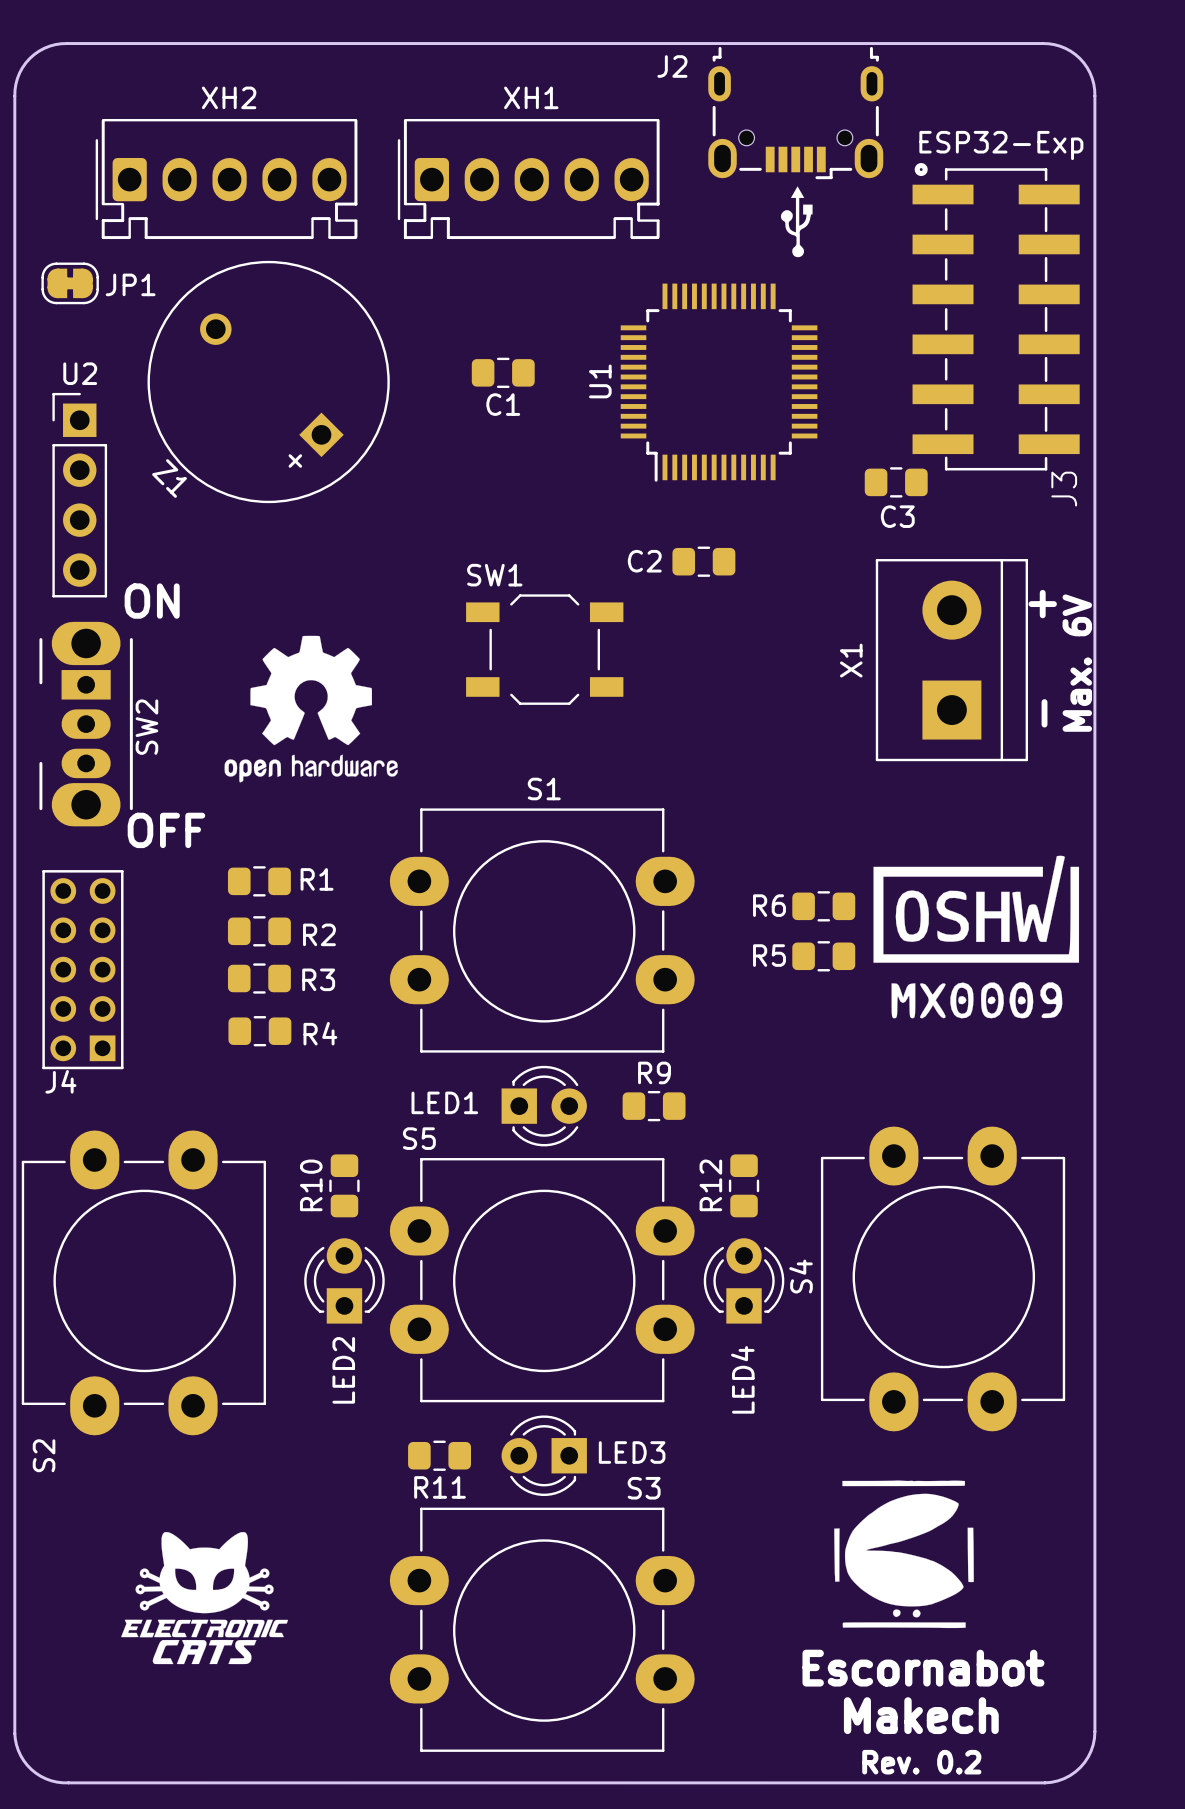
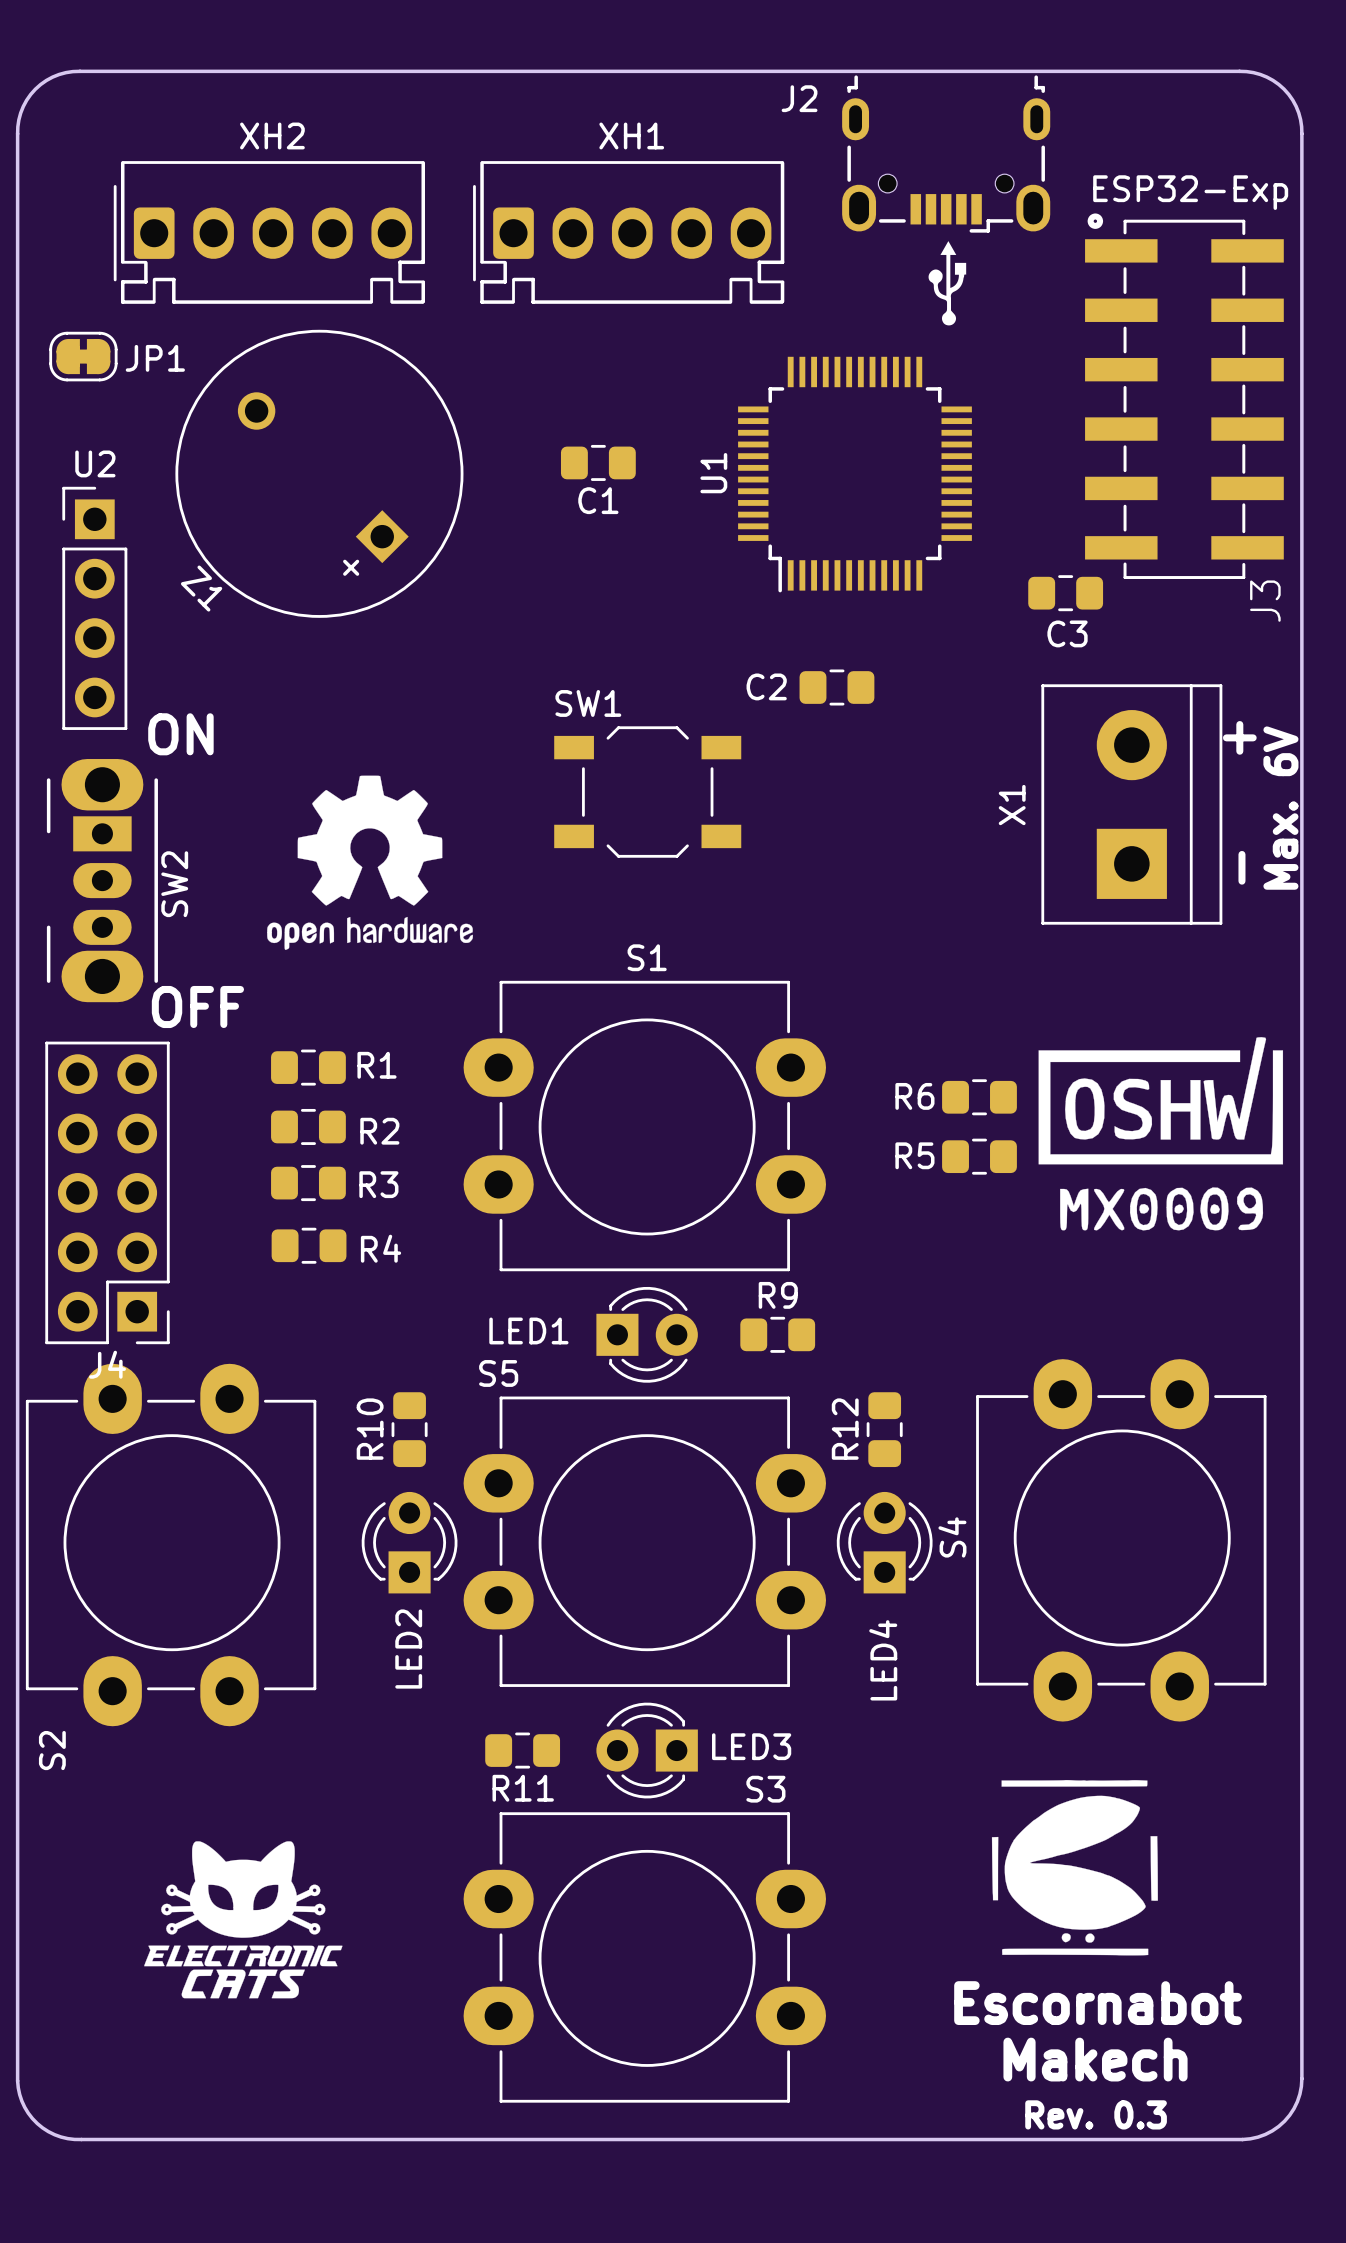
J4 footprint: [42, 870, 124, 1070] -> [45, 1041, 170, 1345]
text: Rev. 0.2 (921, 1762) -> Rev. 0.3 (1096, 2114)

